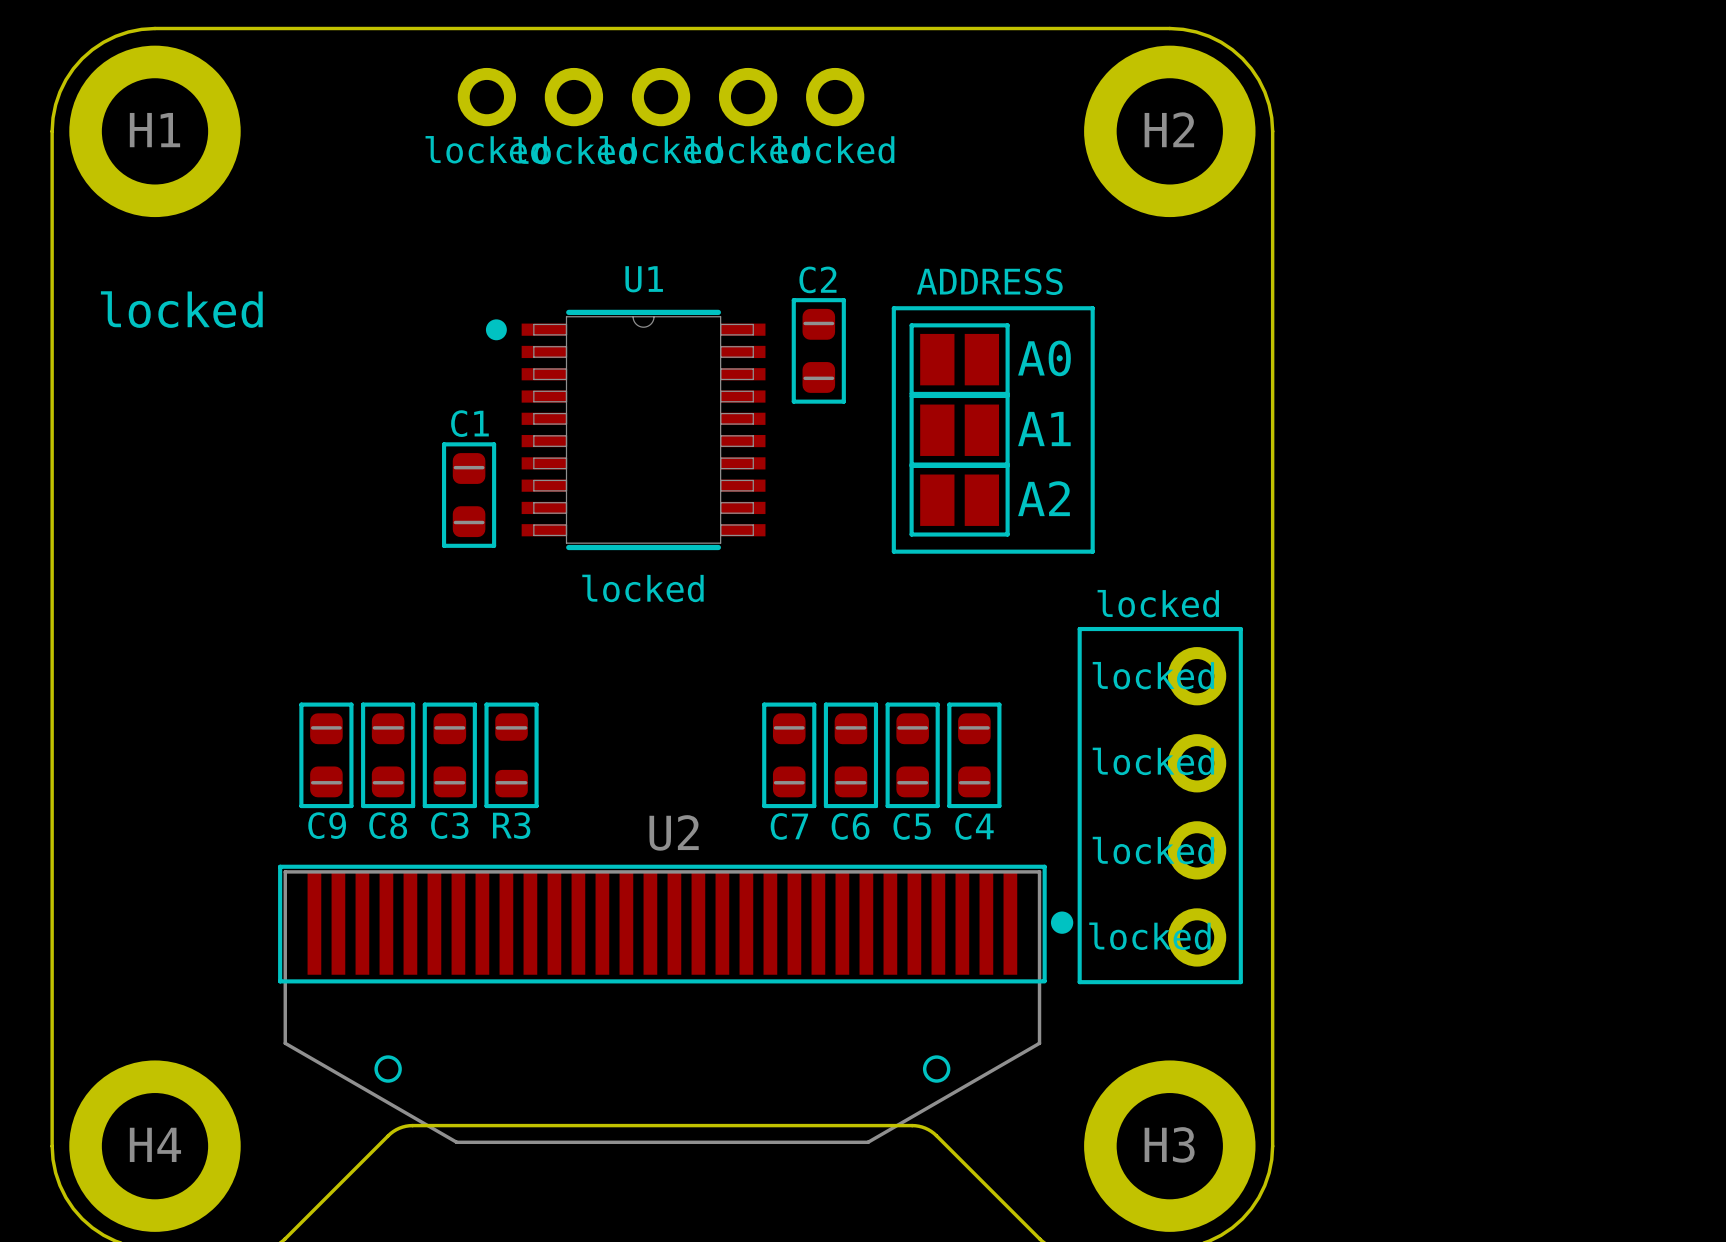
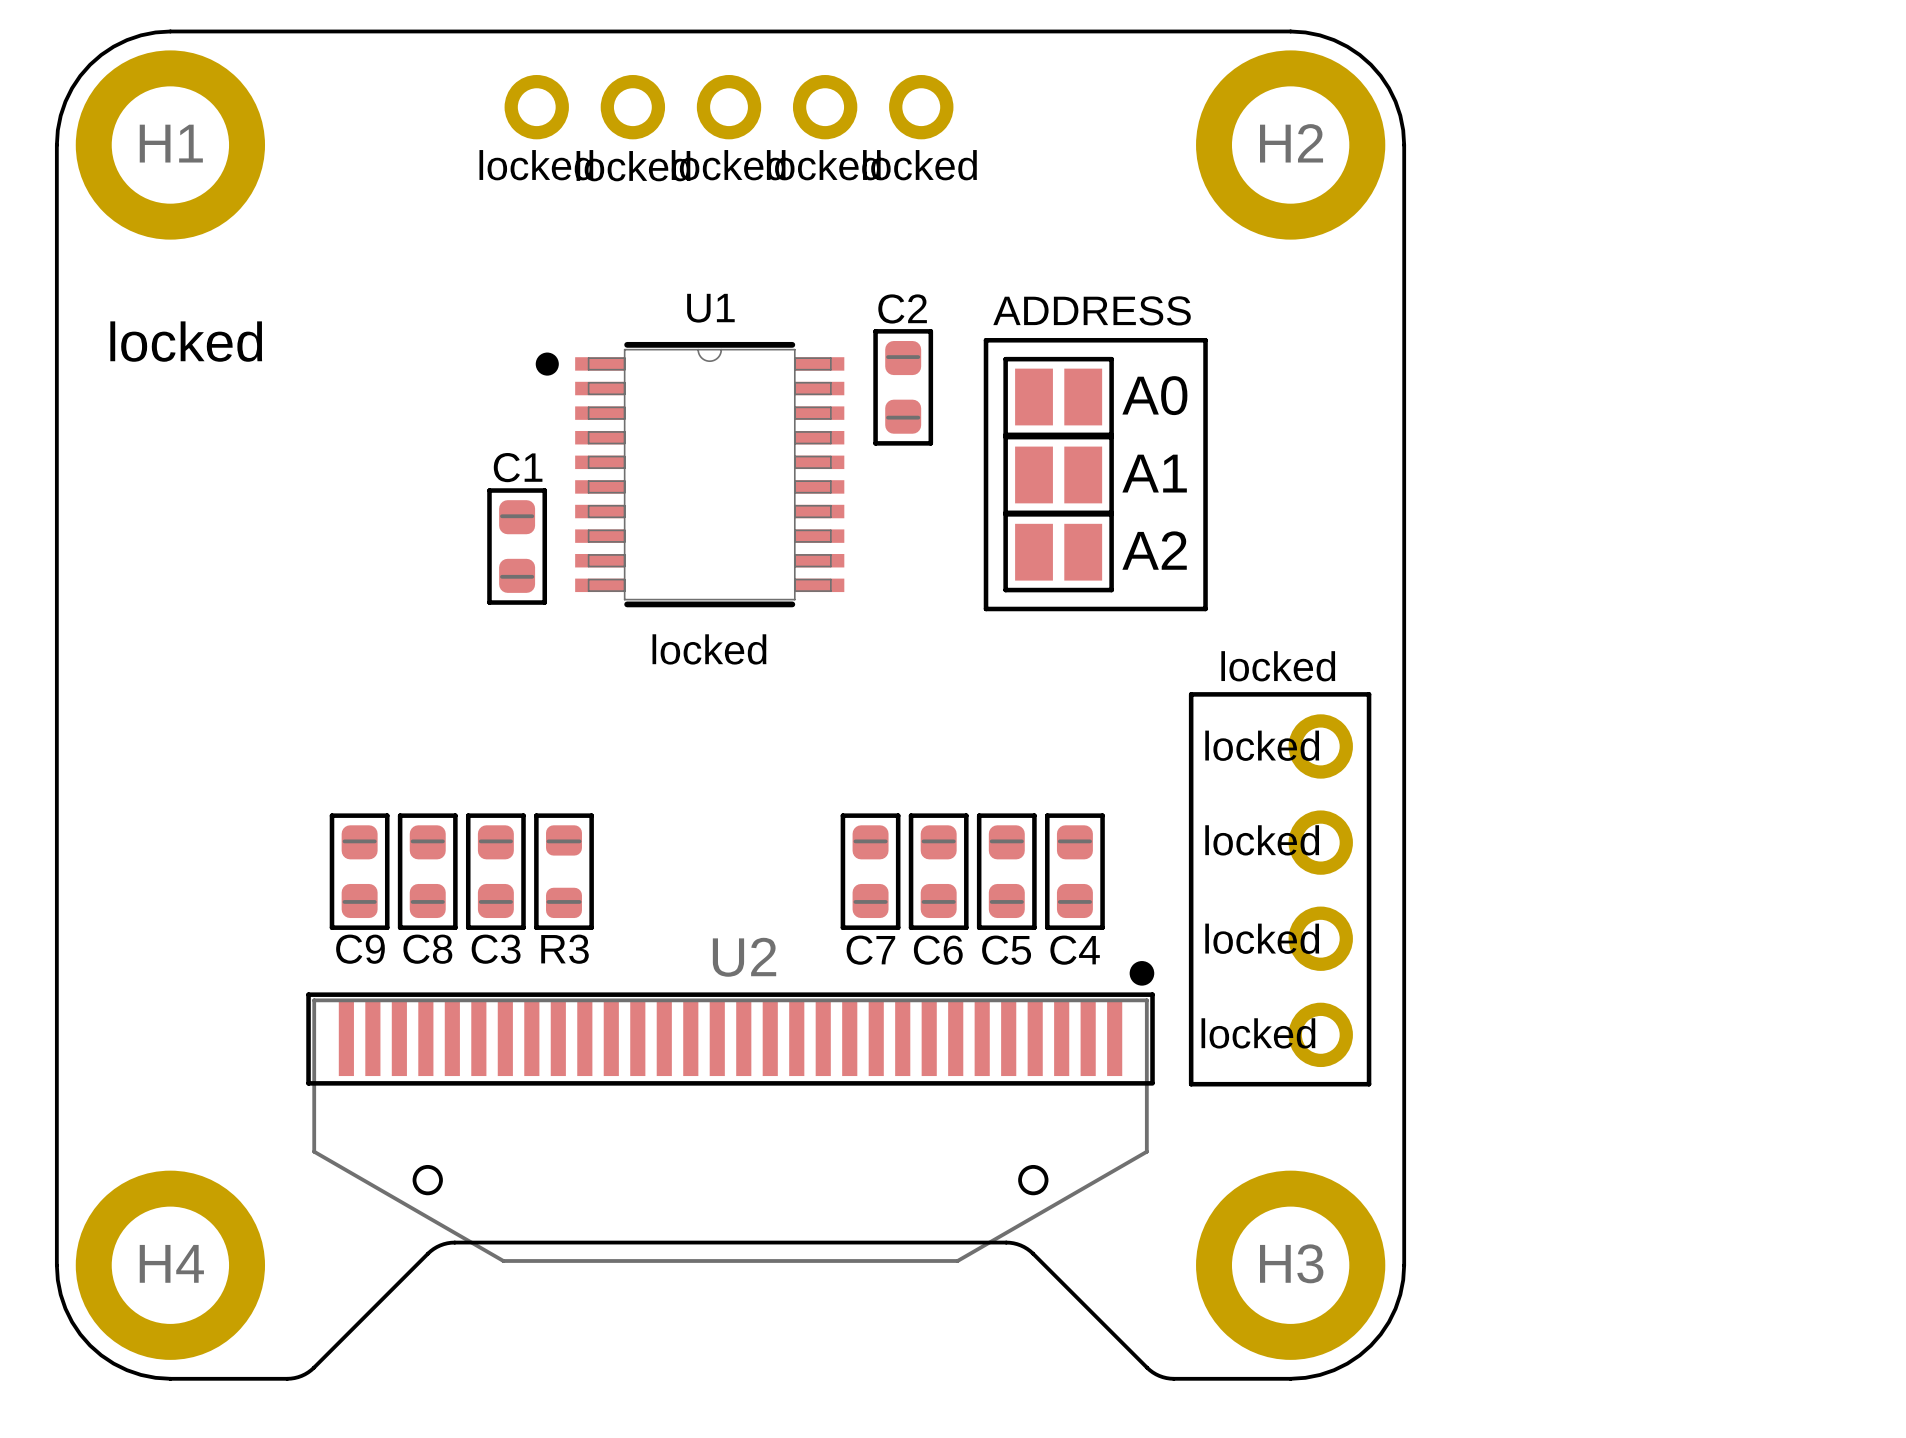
C9 position: (326, 755) -> (359, 871)
C8 position: (388, 755) -> (427, 871)
C3 position: (449, 755) -> (495, 871)
R3 position: (511, 755) -> (564, 871)
C7 position: (789, 755) -> (870, 871)
C6 position: (850, 755) -> (938, 871)
C5 position: (912, 755) -> (1006, 871)
C4 position: (974, 755) -> (1074, 871)
U2 name position: U2 (674, 832) -> U2 (744, 957)
U2 footprint: [278, 864, 1047, 1145] -> [306, 992, 1155, 1263]
drawing position: (1062, 922) -> (1141, 973)

